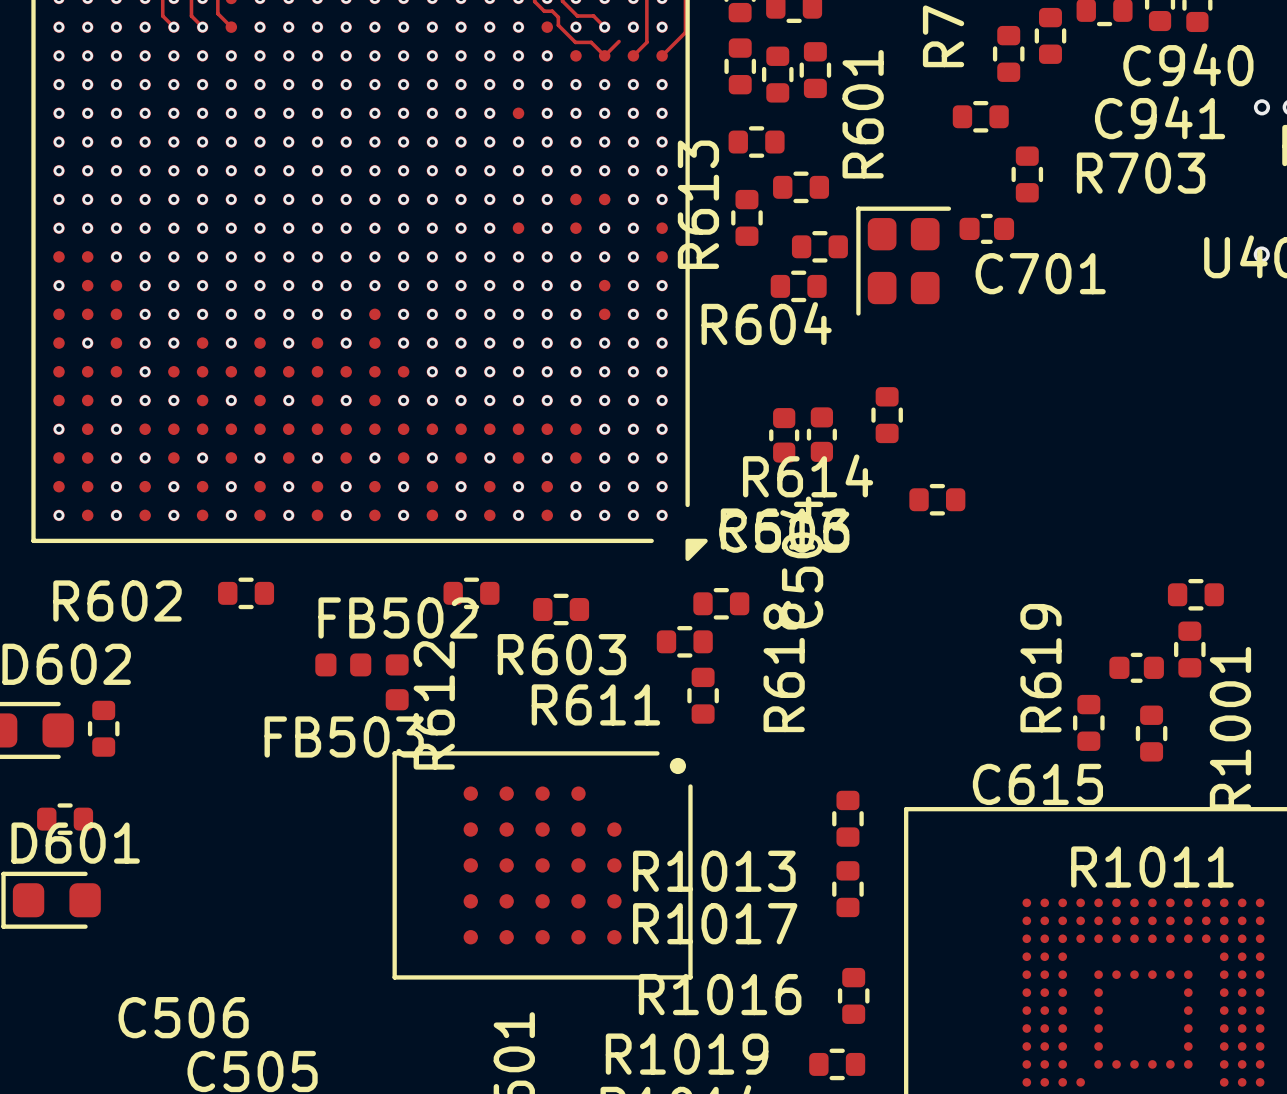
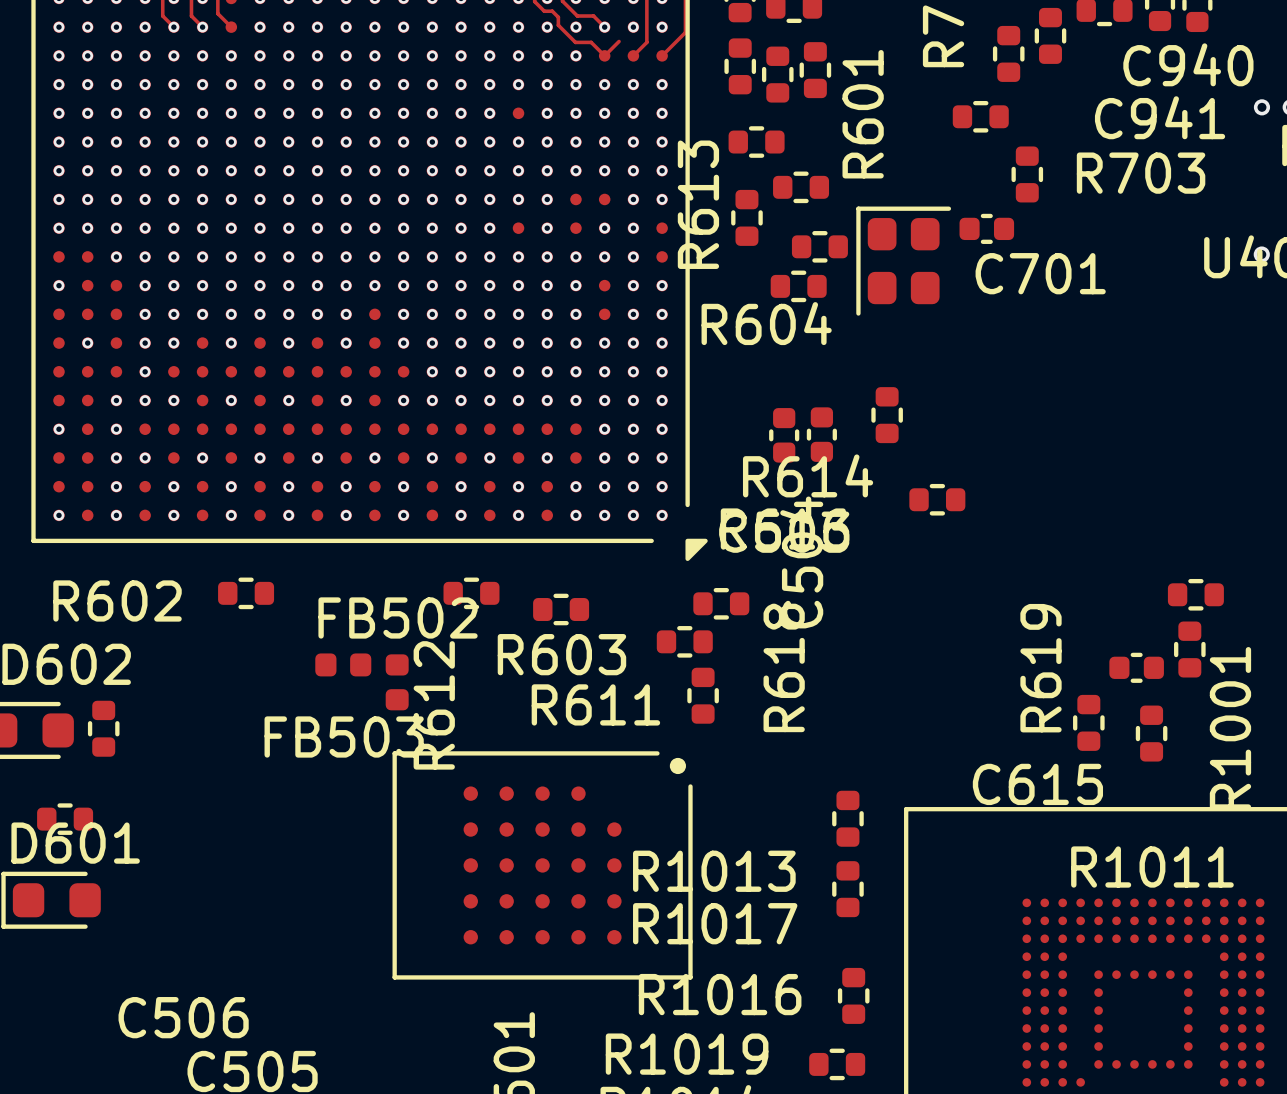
via: none -> (547, 27)
via: none -> (575, 55)

